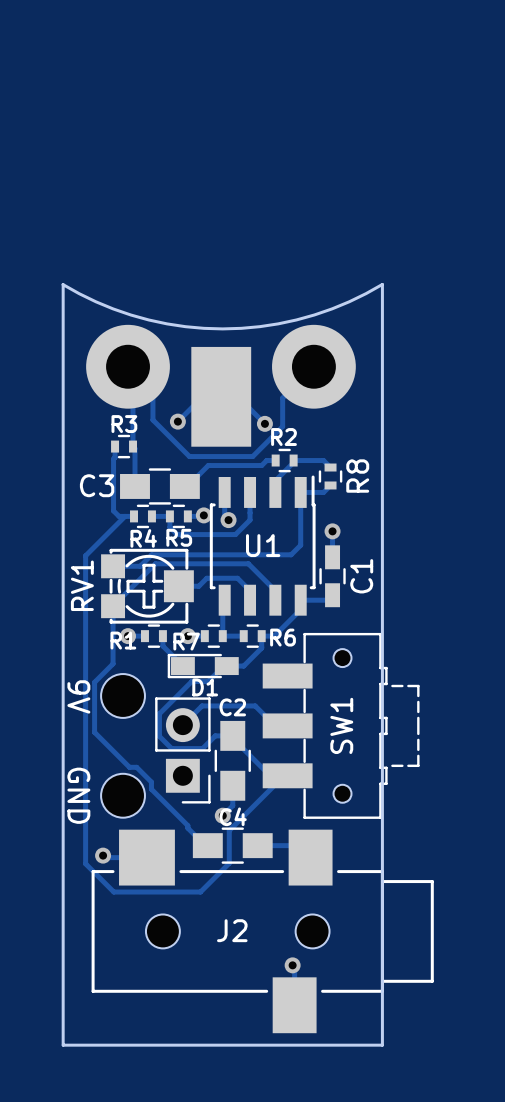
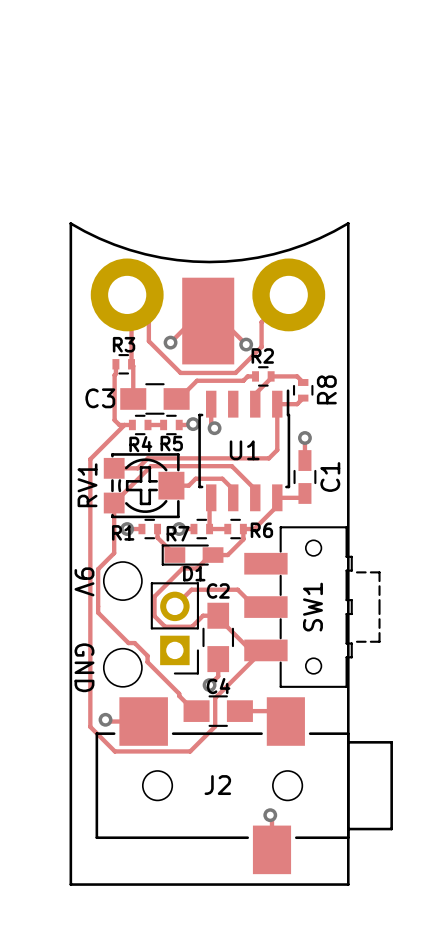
track: (250, 492) (250, 520) (235, 534) (177, 534) (169, 527) (169, 516) -> none

